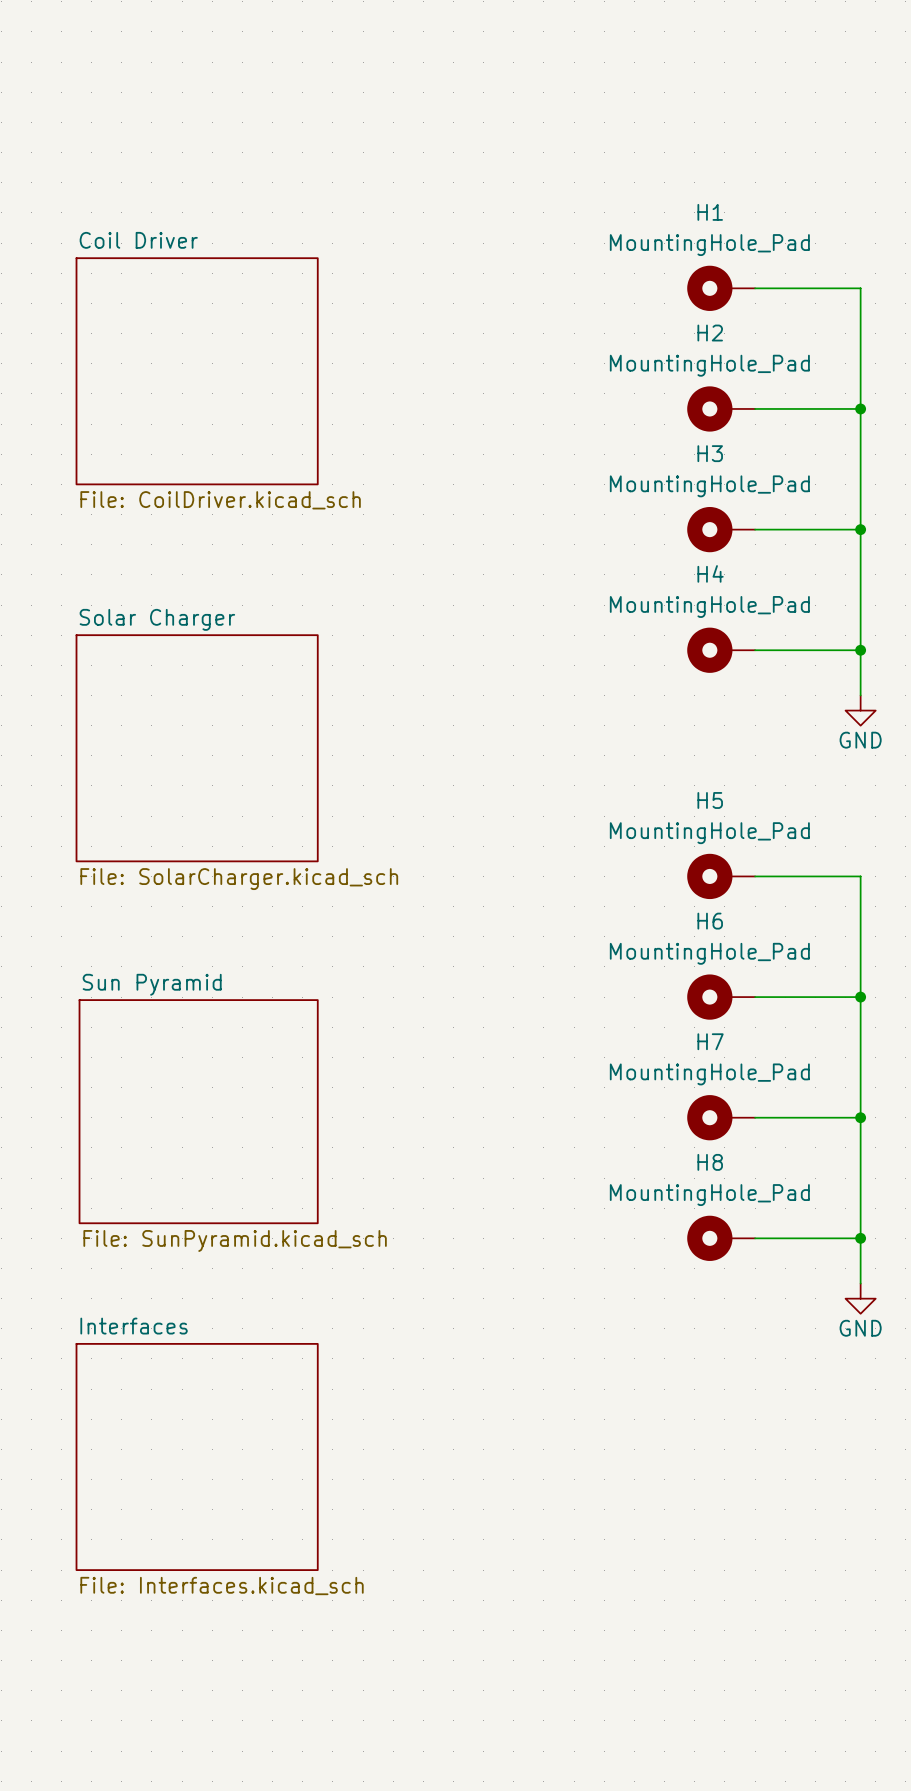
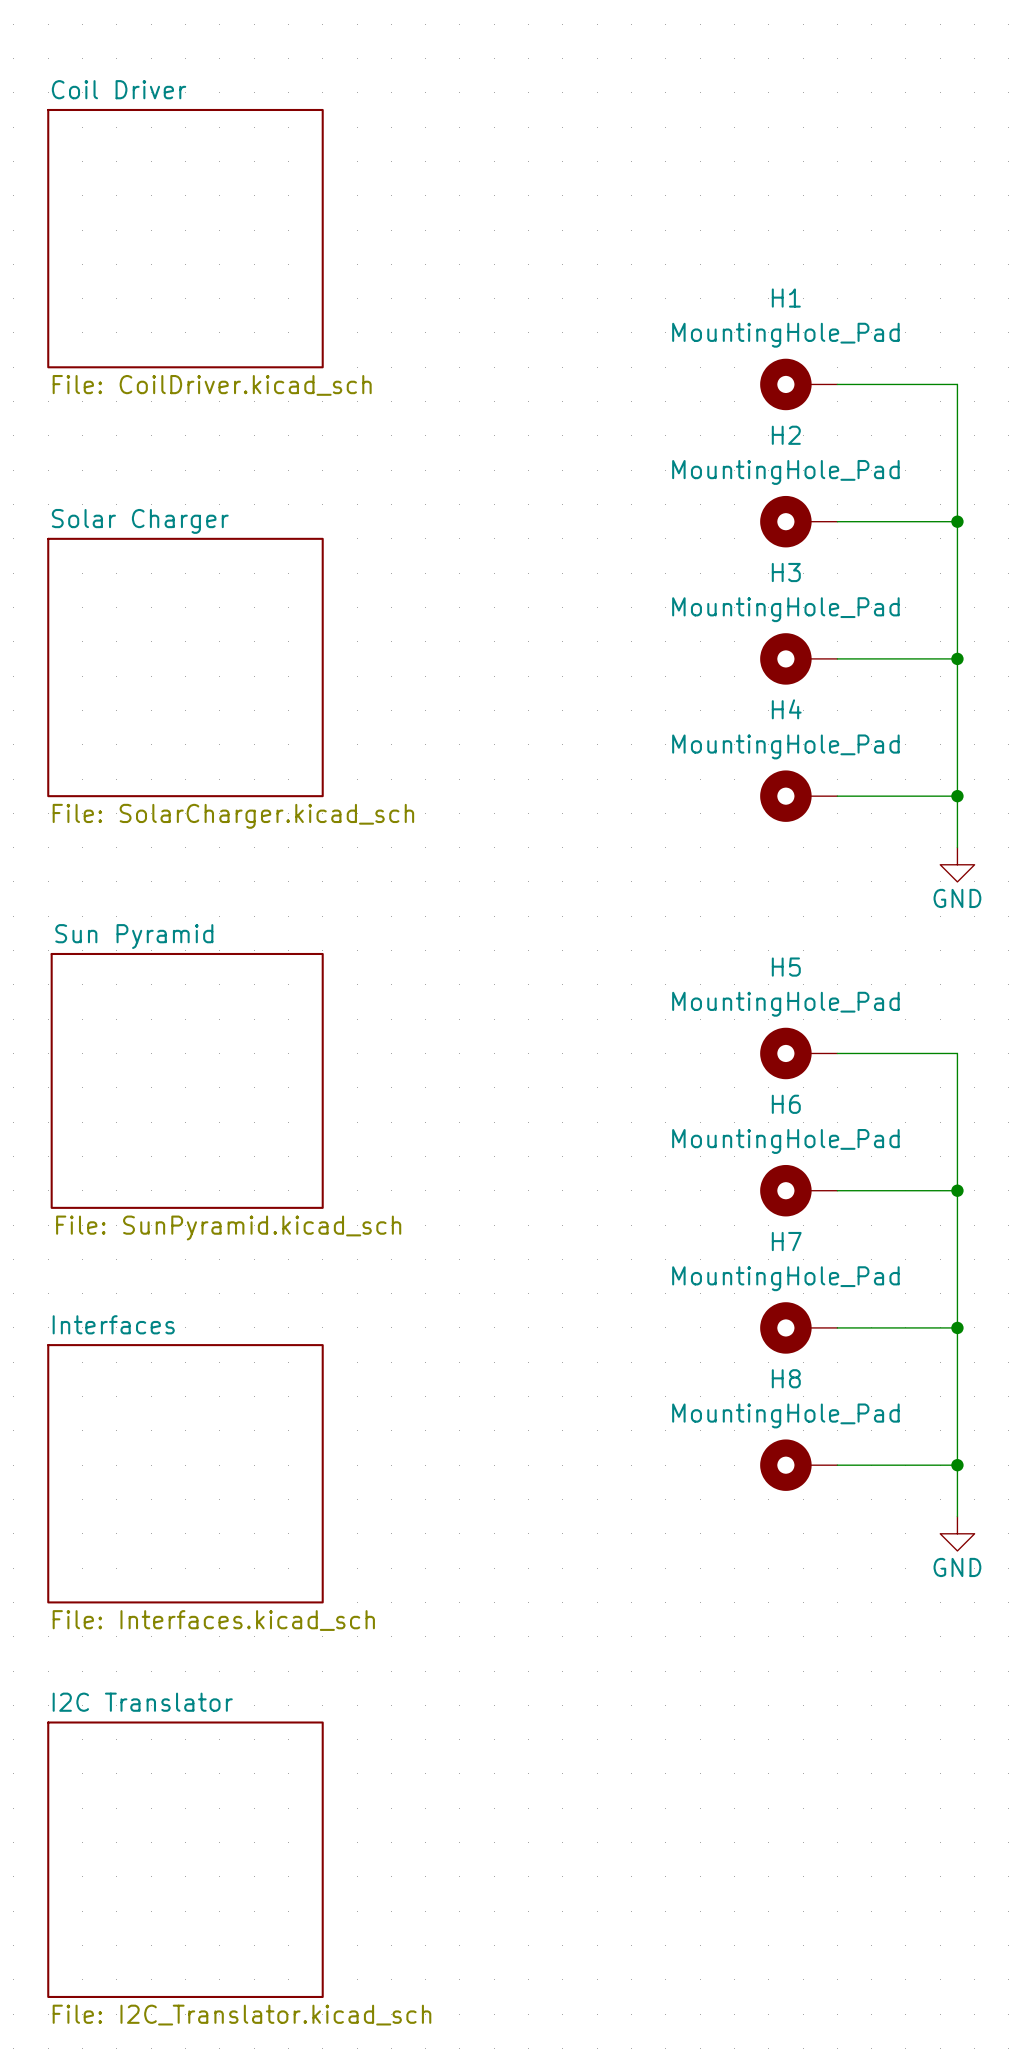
sheet Coil Driver position: (197, 371) -> (185, 238)
sheet Solar Charger position: (197, 748) -> (185, 667)
sheet Sun Pyramid position: (198, 1111) -> (187, 1080)
sheet Interfaces position: (197, 1456) -> (185, 1473)
sheet I2C Translator: none -> File: I2C_Translator.kicad_sch (185, 1859)

